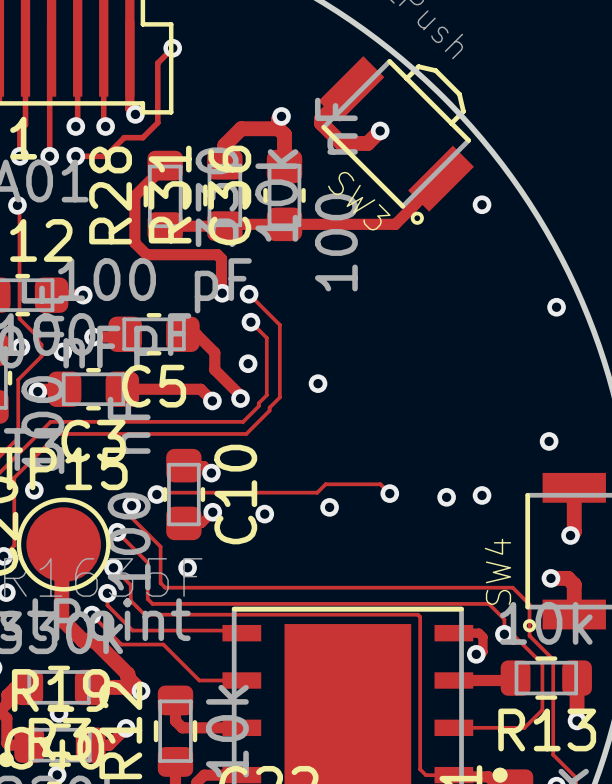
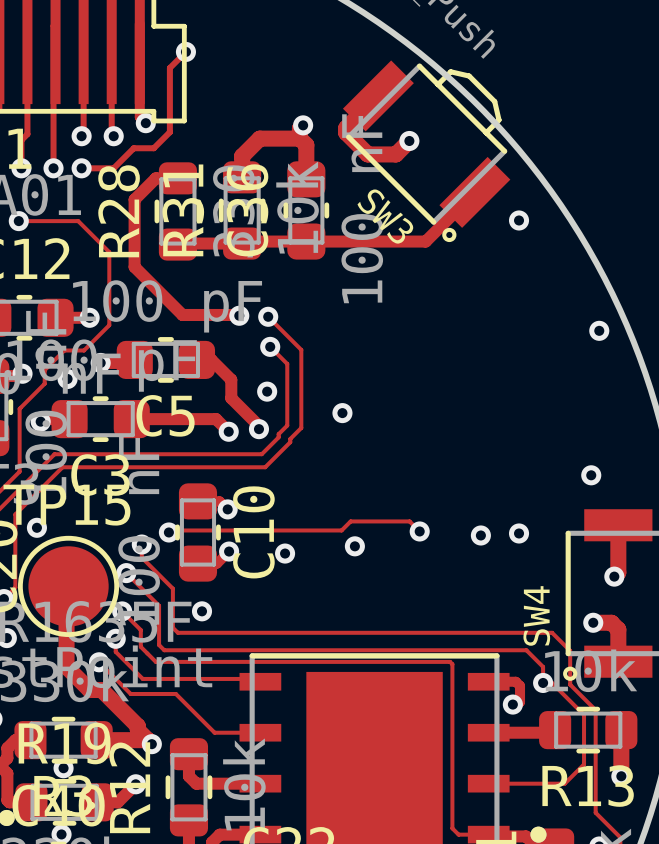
track: (165, 165) (134, 196) (134, 242) (146, 254) (217, 254) (221, 258) (221, 292) -> (177, 178) (155, 178) (134, 199) (134, 267) (182, 314) (238, 314)
track: (17, 205) (19, 207) (19, 318) (38, 337) (38, 341) (41, 344) -> (18, 221) (78, 221) (109, 252) (109, 325) (84, 350) (64, 350) (44, 370)

